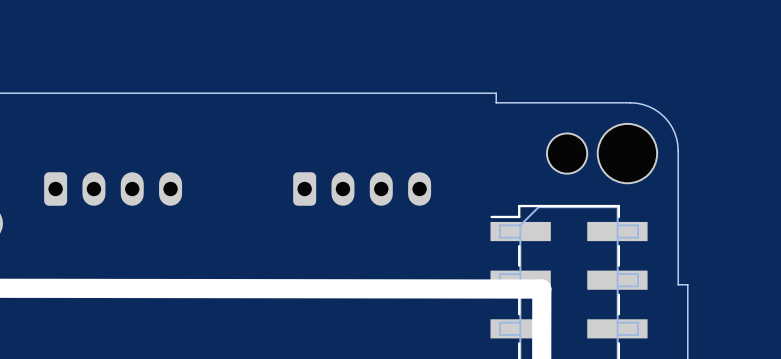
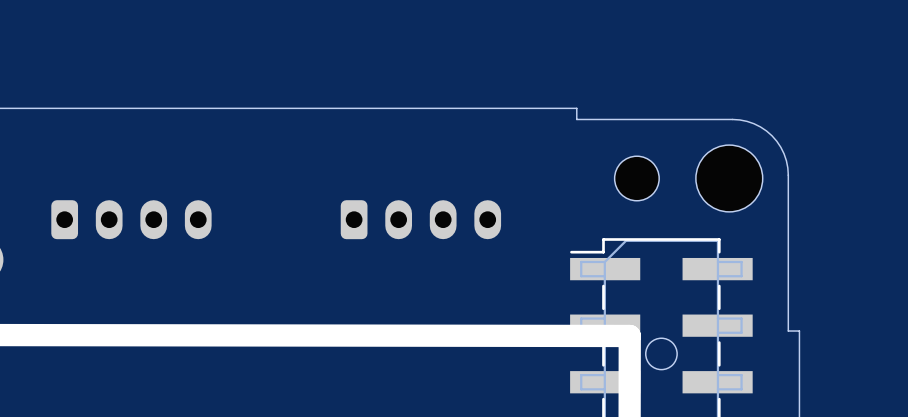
part footprint: [546, 122, 659, 185] -> [614, 145, 763, 212]
round board edge: none -> [645, 337, 678, 371]

